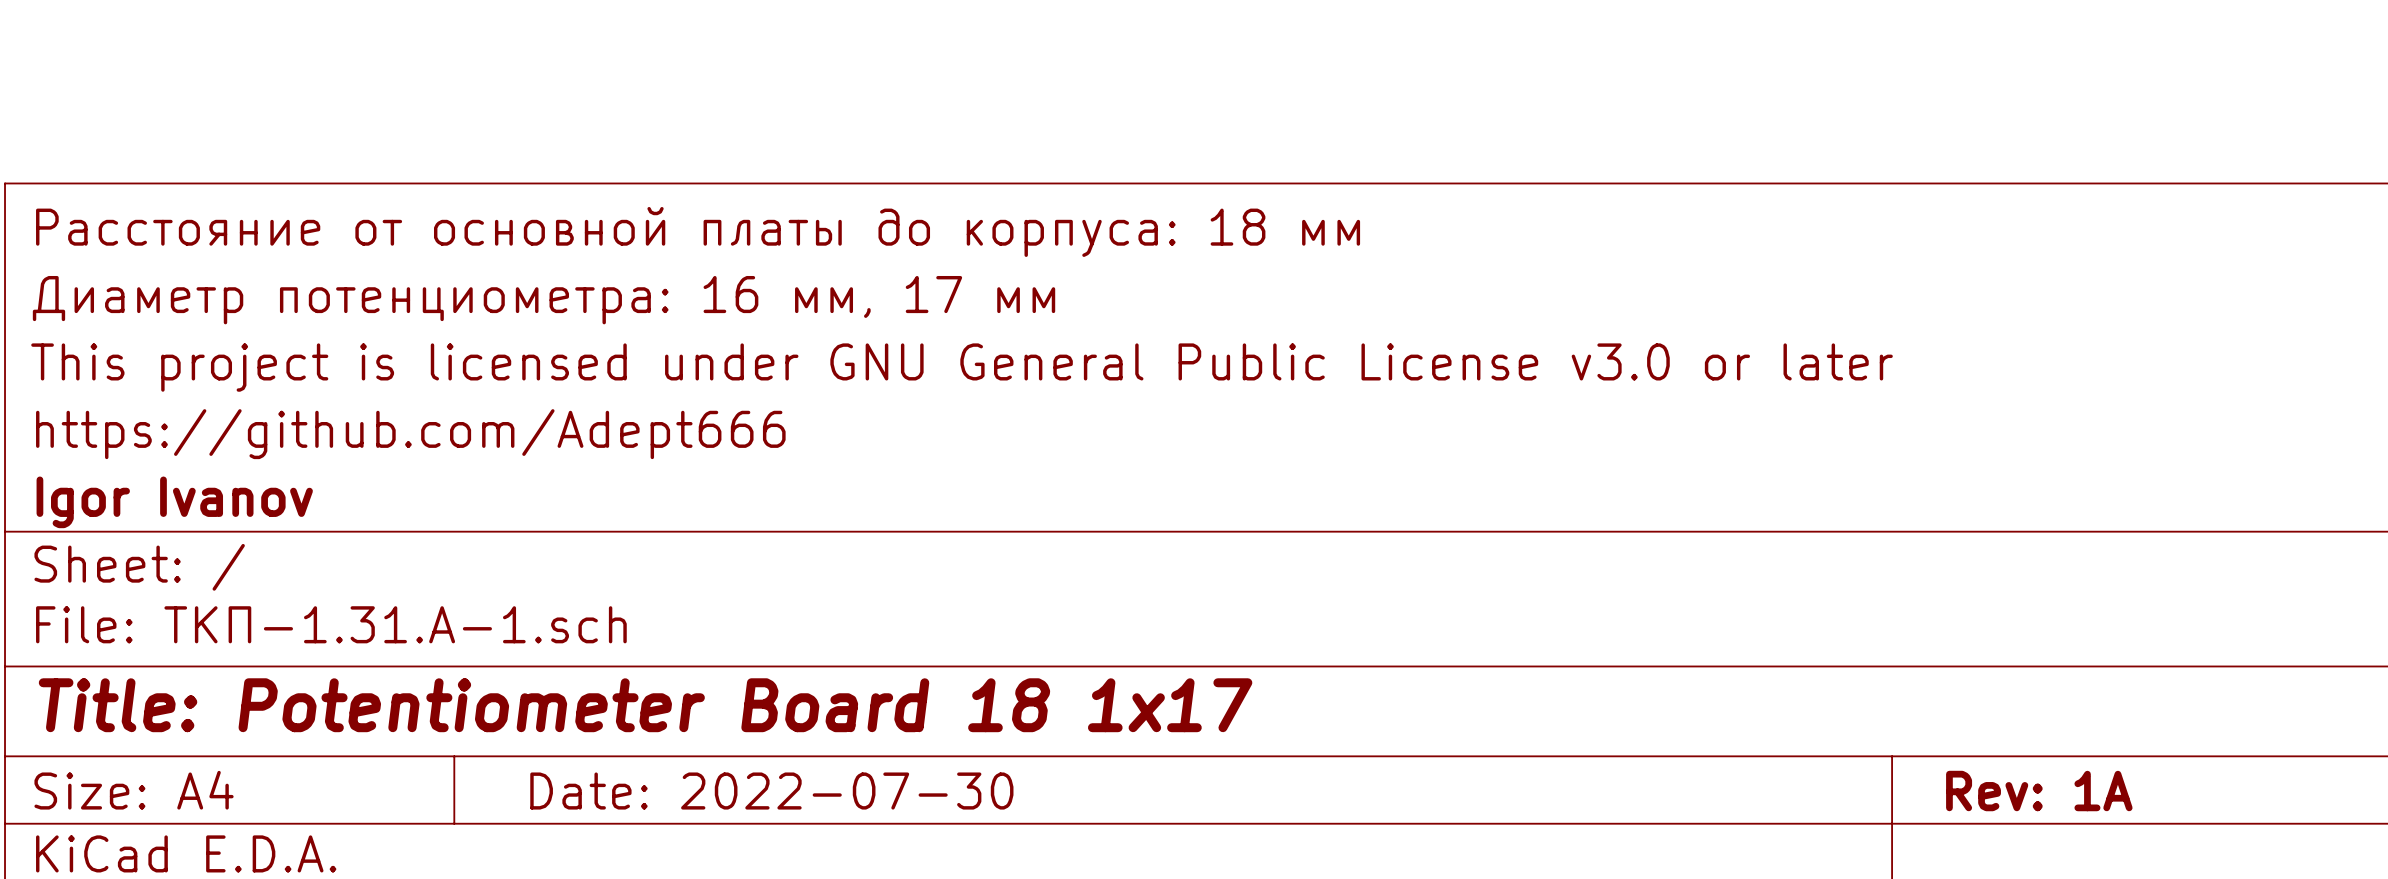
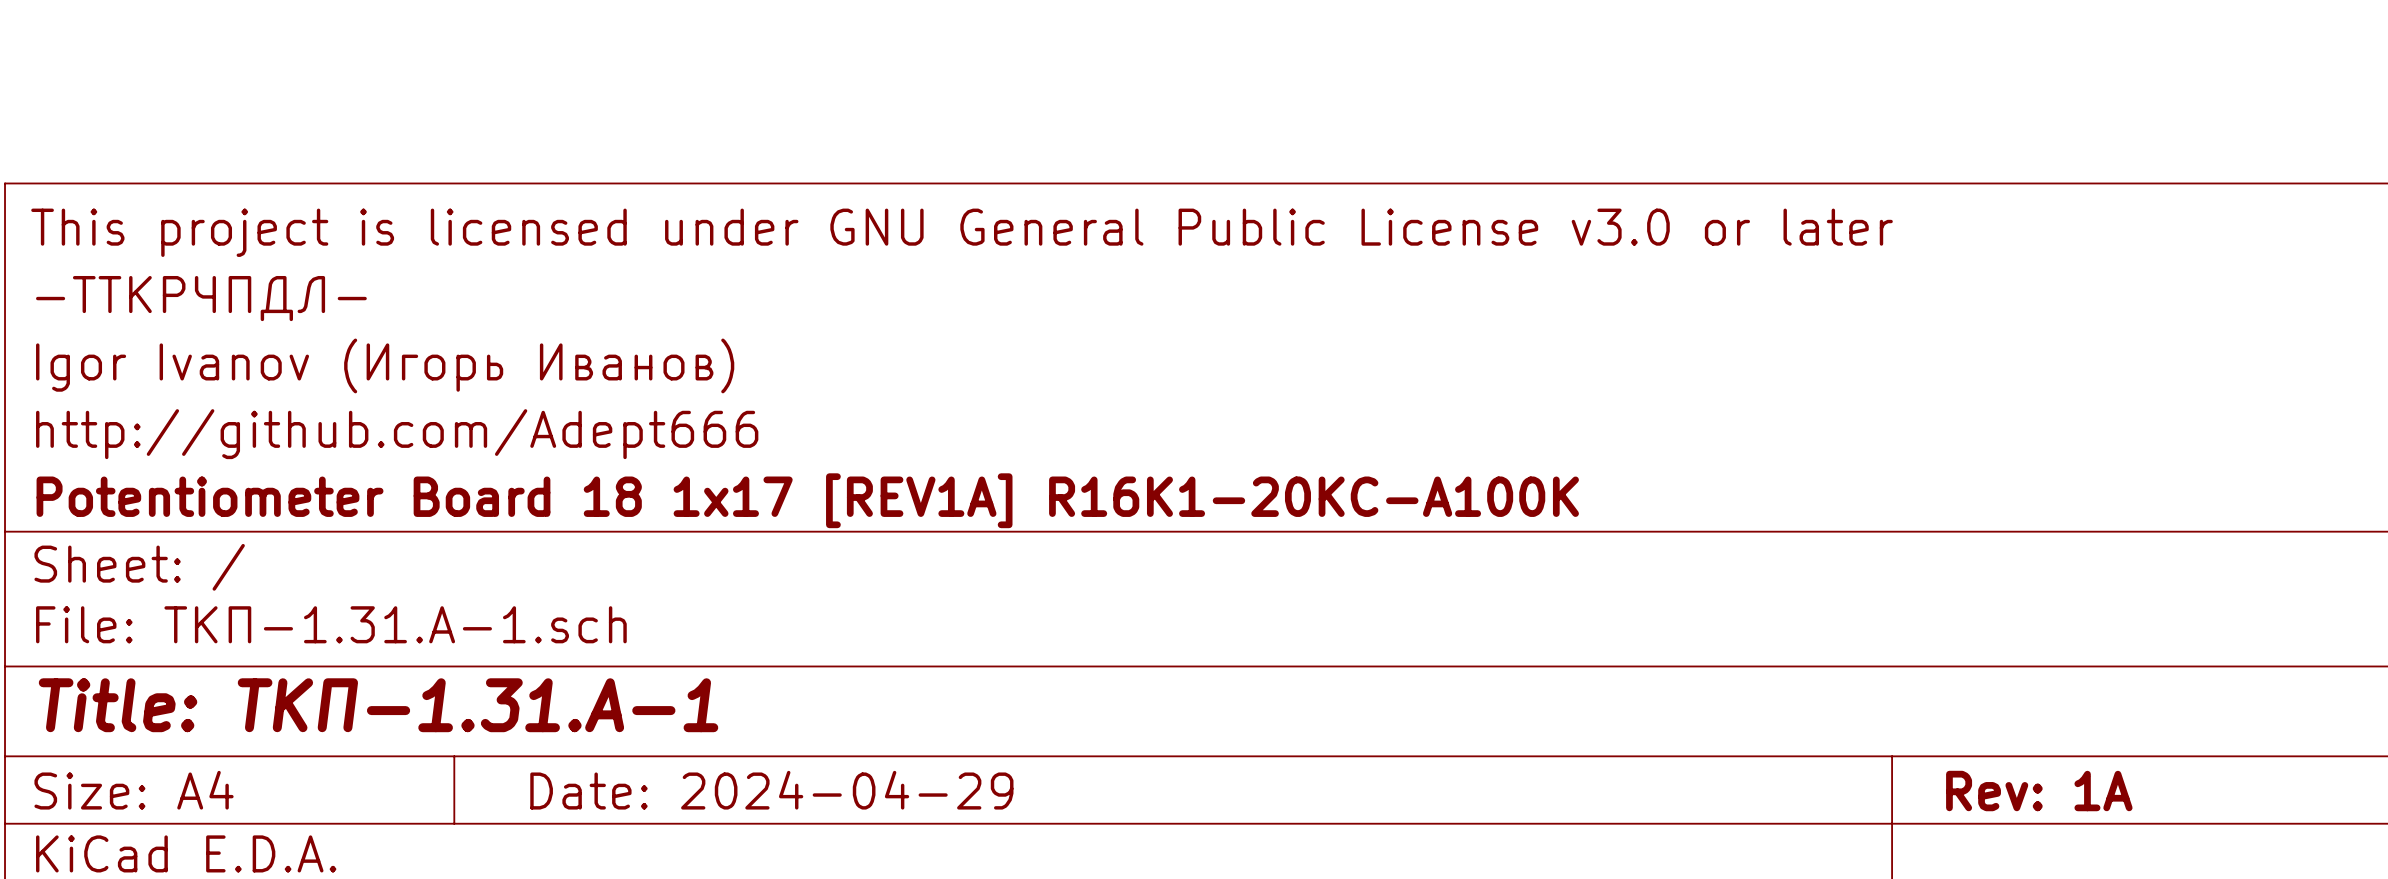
title block: Расстояние от основной платы до корпуса: 18 мм (698, 231) -> This project is licensed under GNU General Public License v3.0 or later (962, 232)
title block: Диаметр потенциометра: 16 мм, 17 мм (544, 300) -> -ТТКРЧПДЛ- (201, 298)
title block: This project is licensed under GNU General Public License v3.0 or later (962, 367) -> Igor Ivanov (Игорь Иванов) (385, 365)
title block: https://github.com/Adept666 (410, 434) -> http://github.com/Adept666 (397, 434)
title block: Igor Ivanov (174, 502) -> Potentiometer Board 18 1x17 [REV1A] R16K1-20KC-A100K (807, 500)
title block: Title: Potentiometer Board 18 1x17 (645, 705) -> Title: ТКП-1.31.A-1 (378, 705)
title block: Date: 2022-07-30 (771, 791) -> Date: 2024-04-29 (771, 790)

